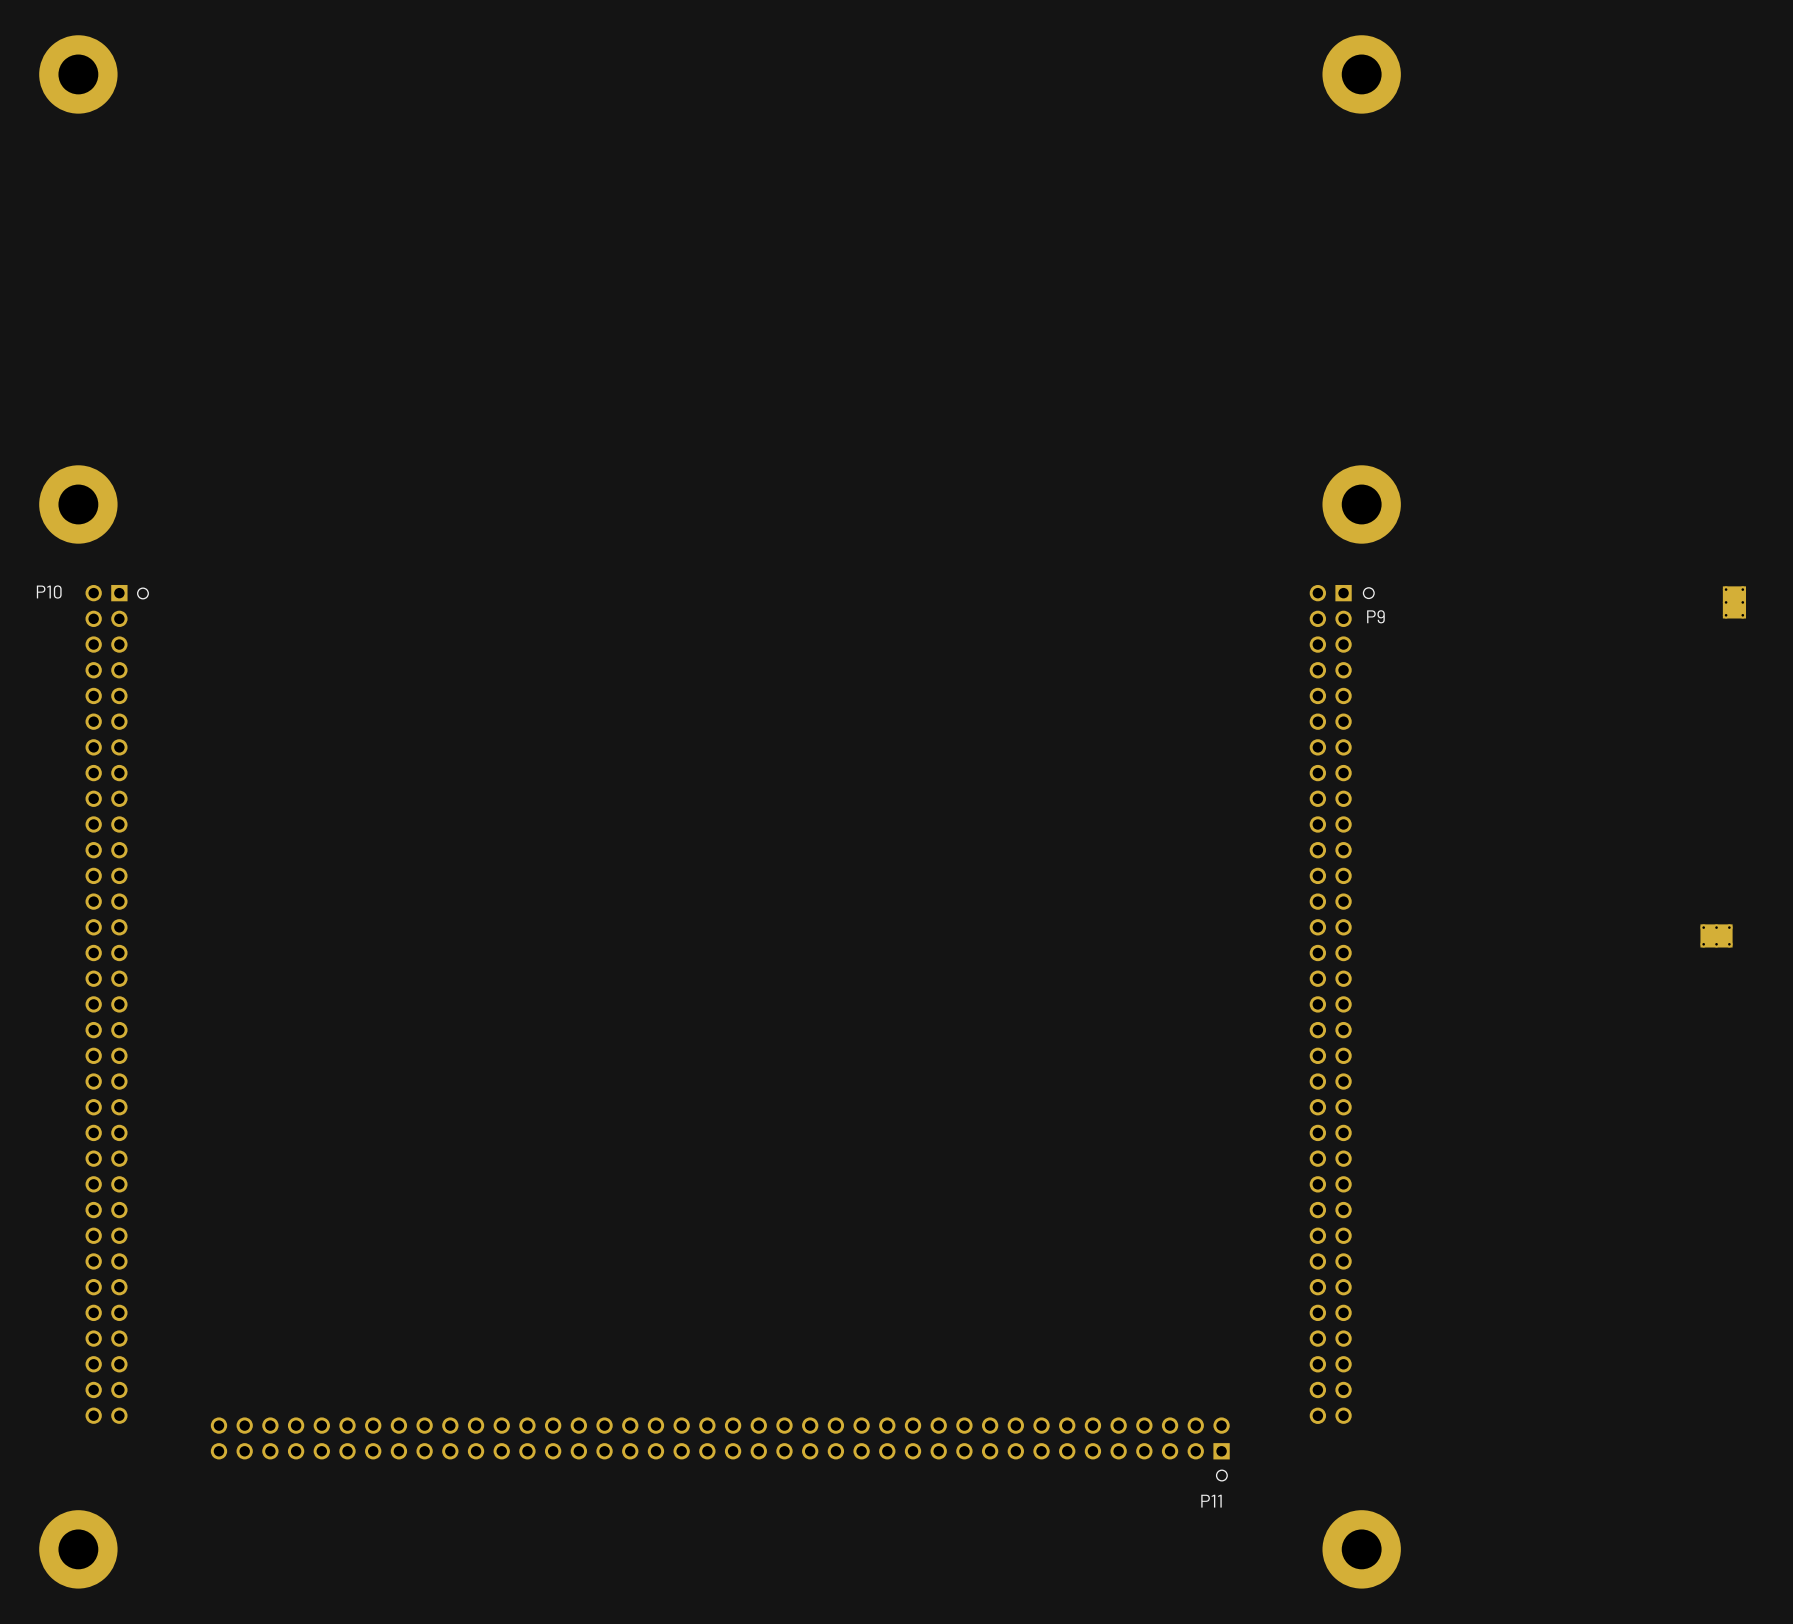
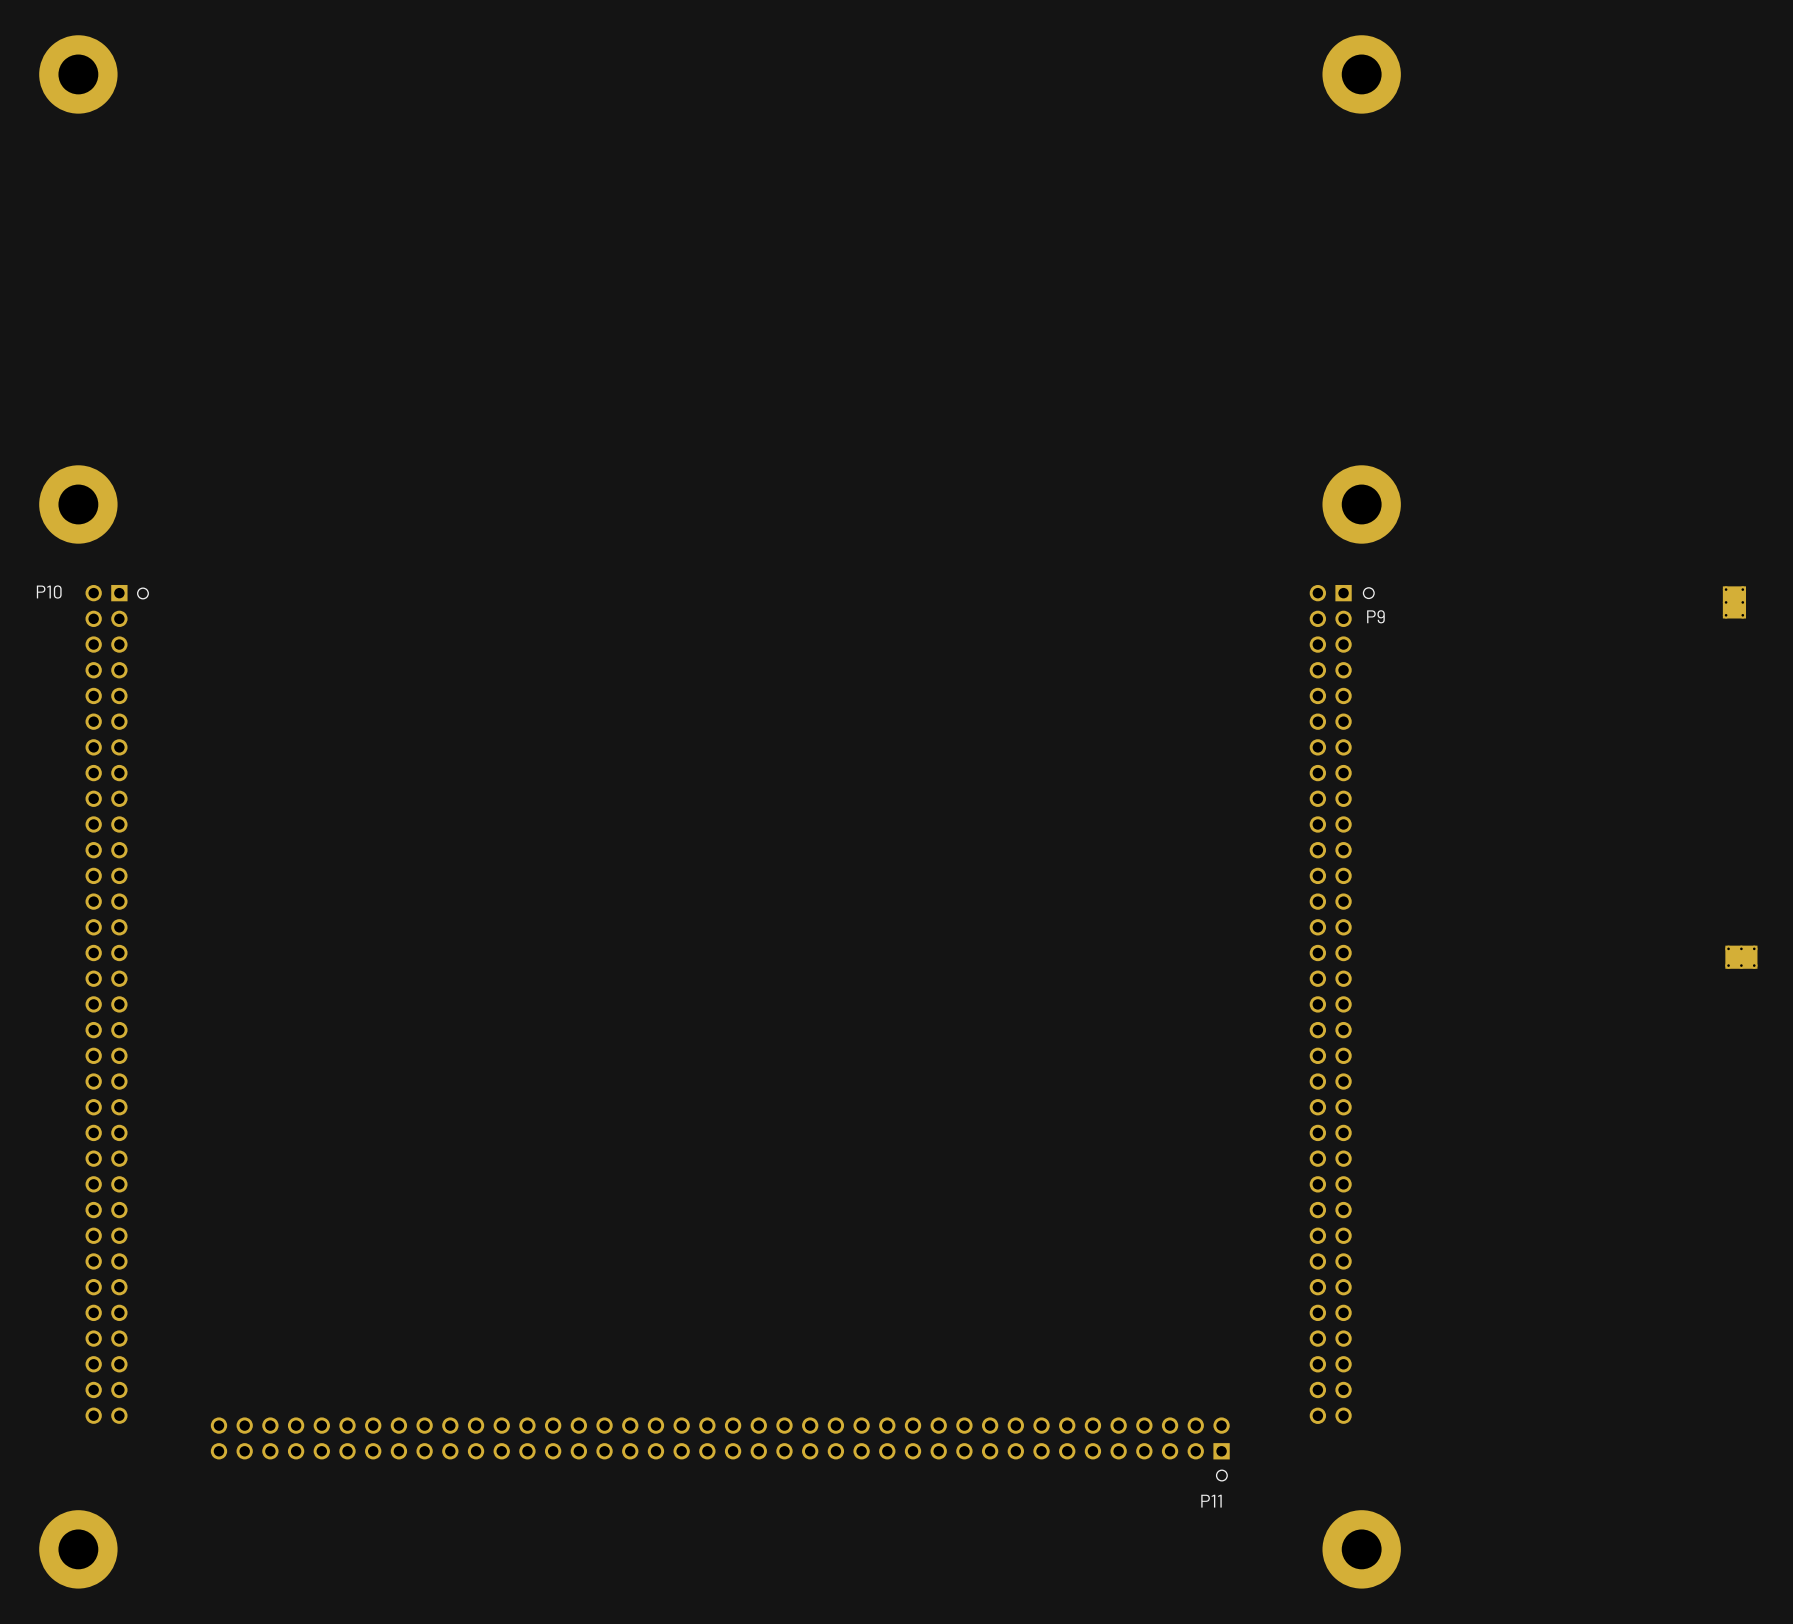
part position: (1716, 935) -> (1741, 957)

